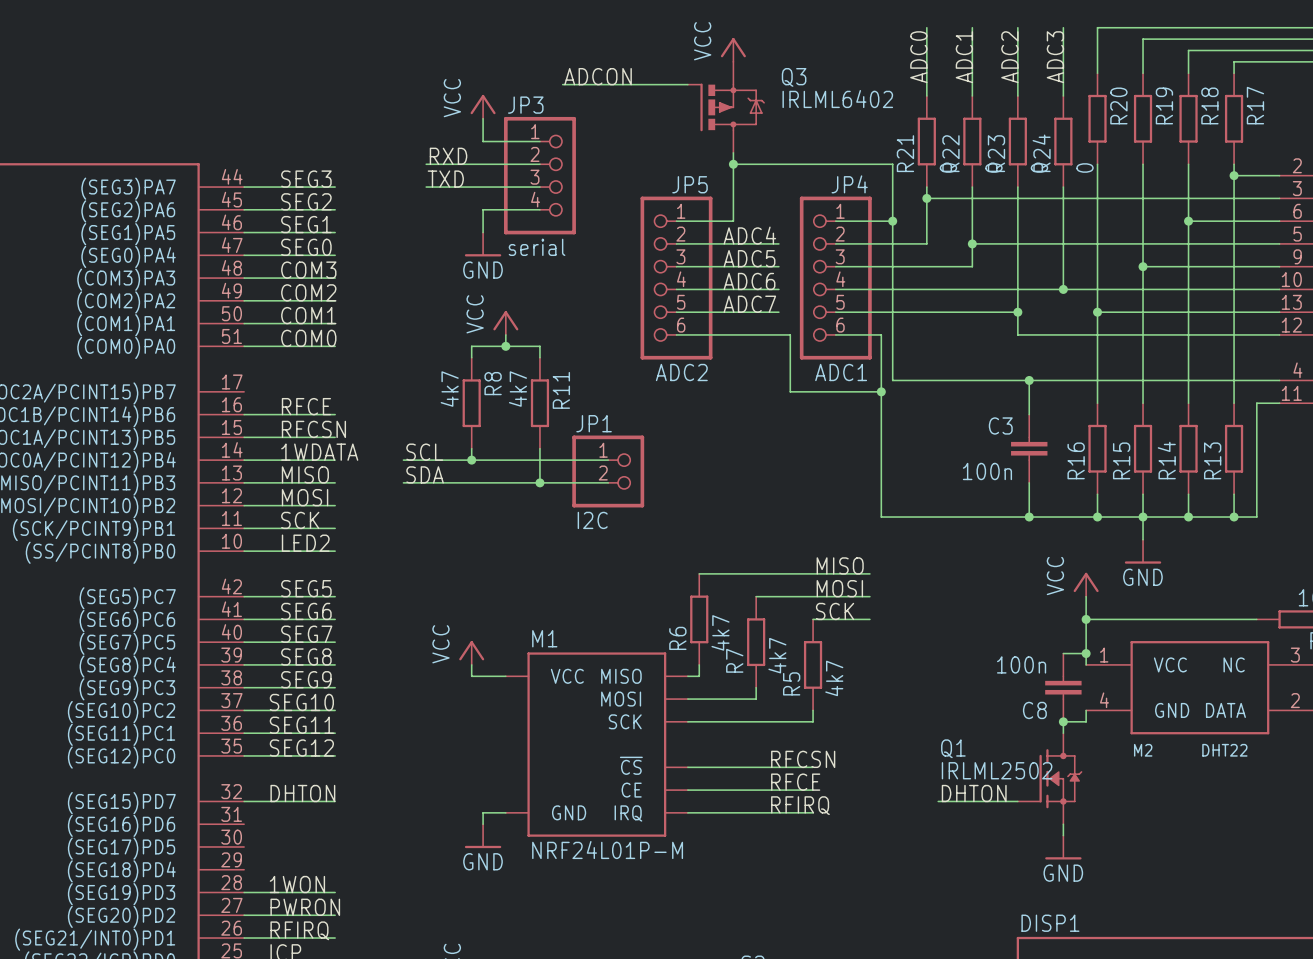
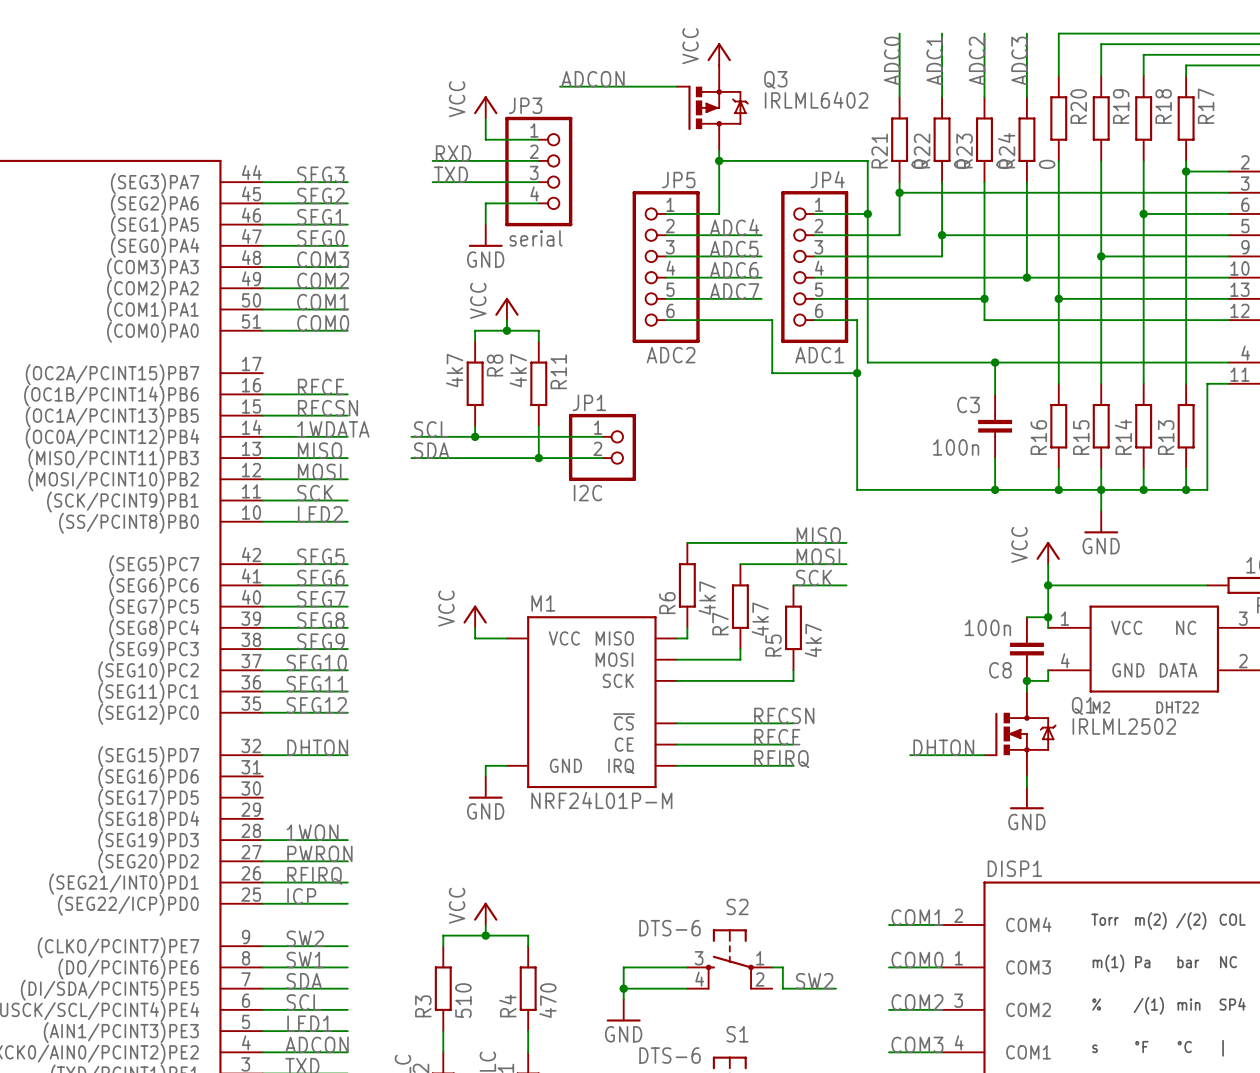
Q1 symbol: [1017, 733, 1083, 825] -> [983, 691, 1057, 777]
Q1 name position: Q1 (953, 748) -> Q1 (1083, 706)
Q1 value position: IRLML2502 (997, 770) -> IRLML2502 (1124, 726)

